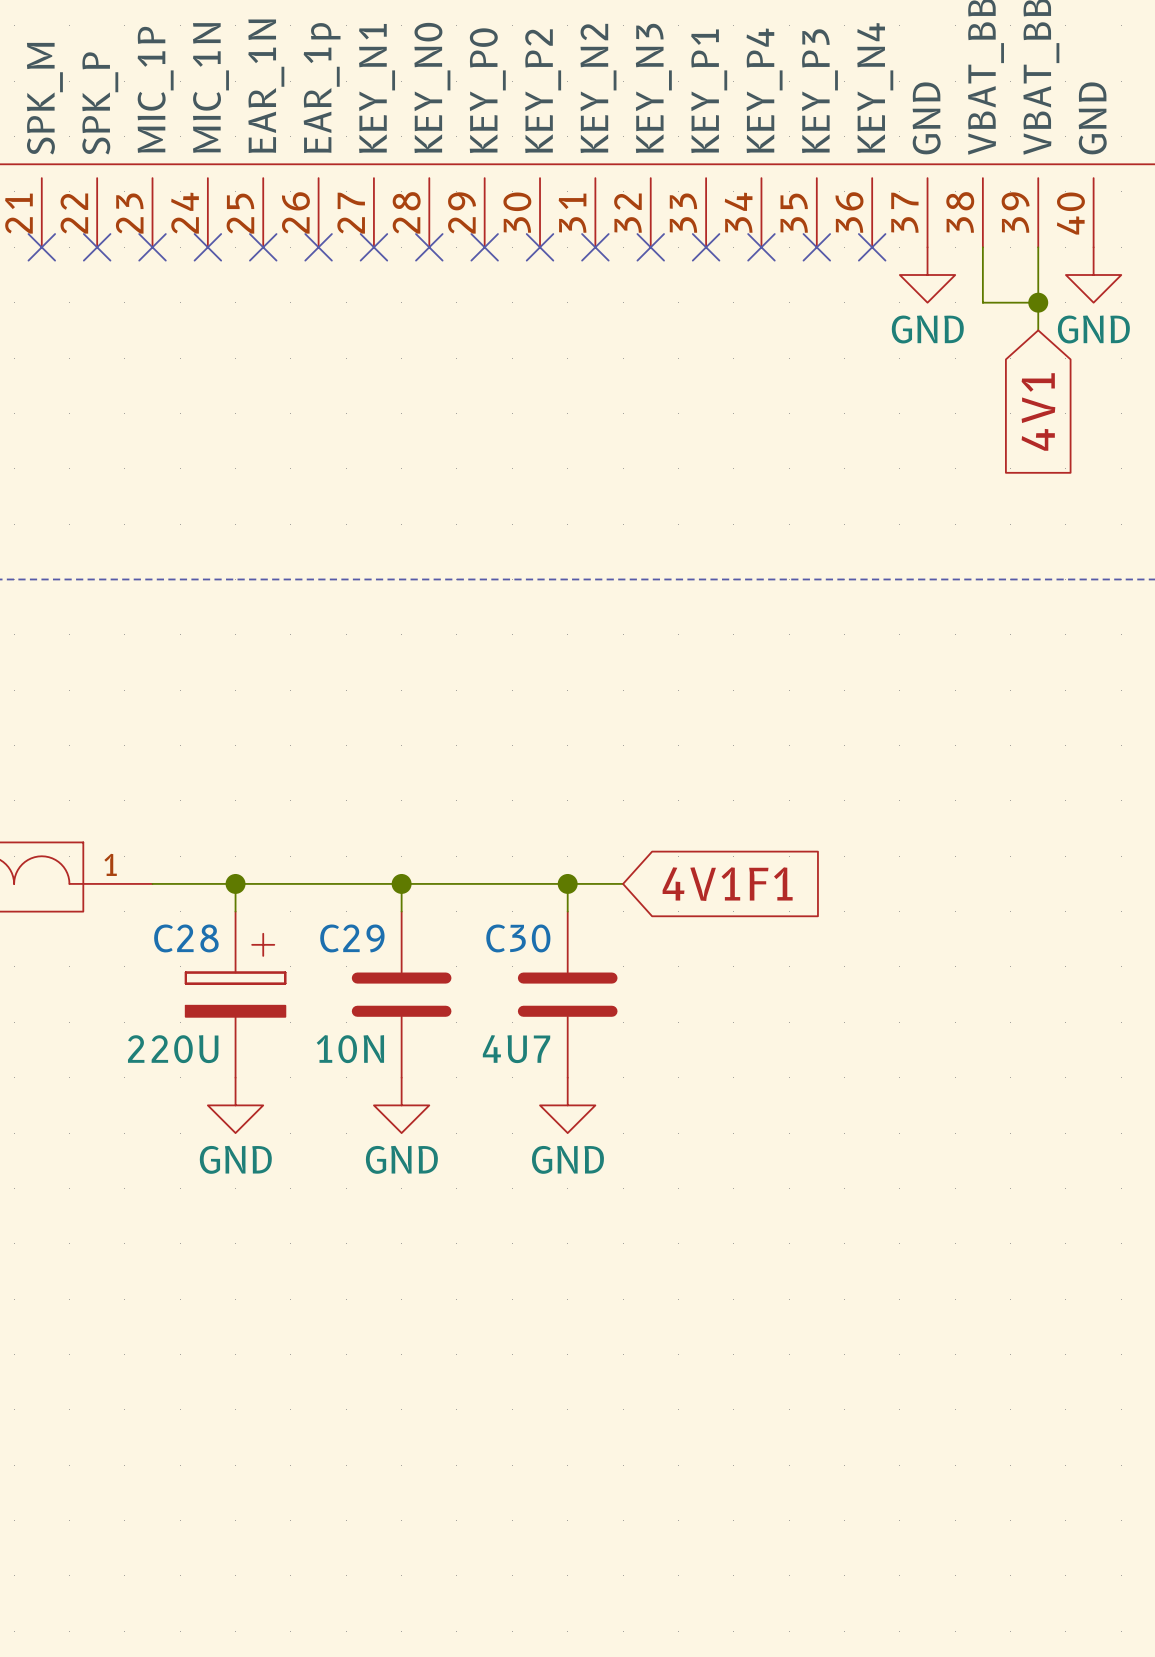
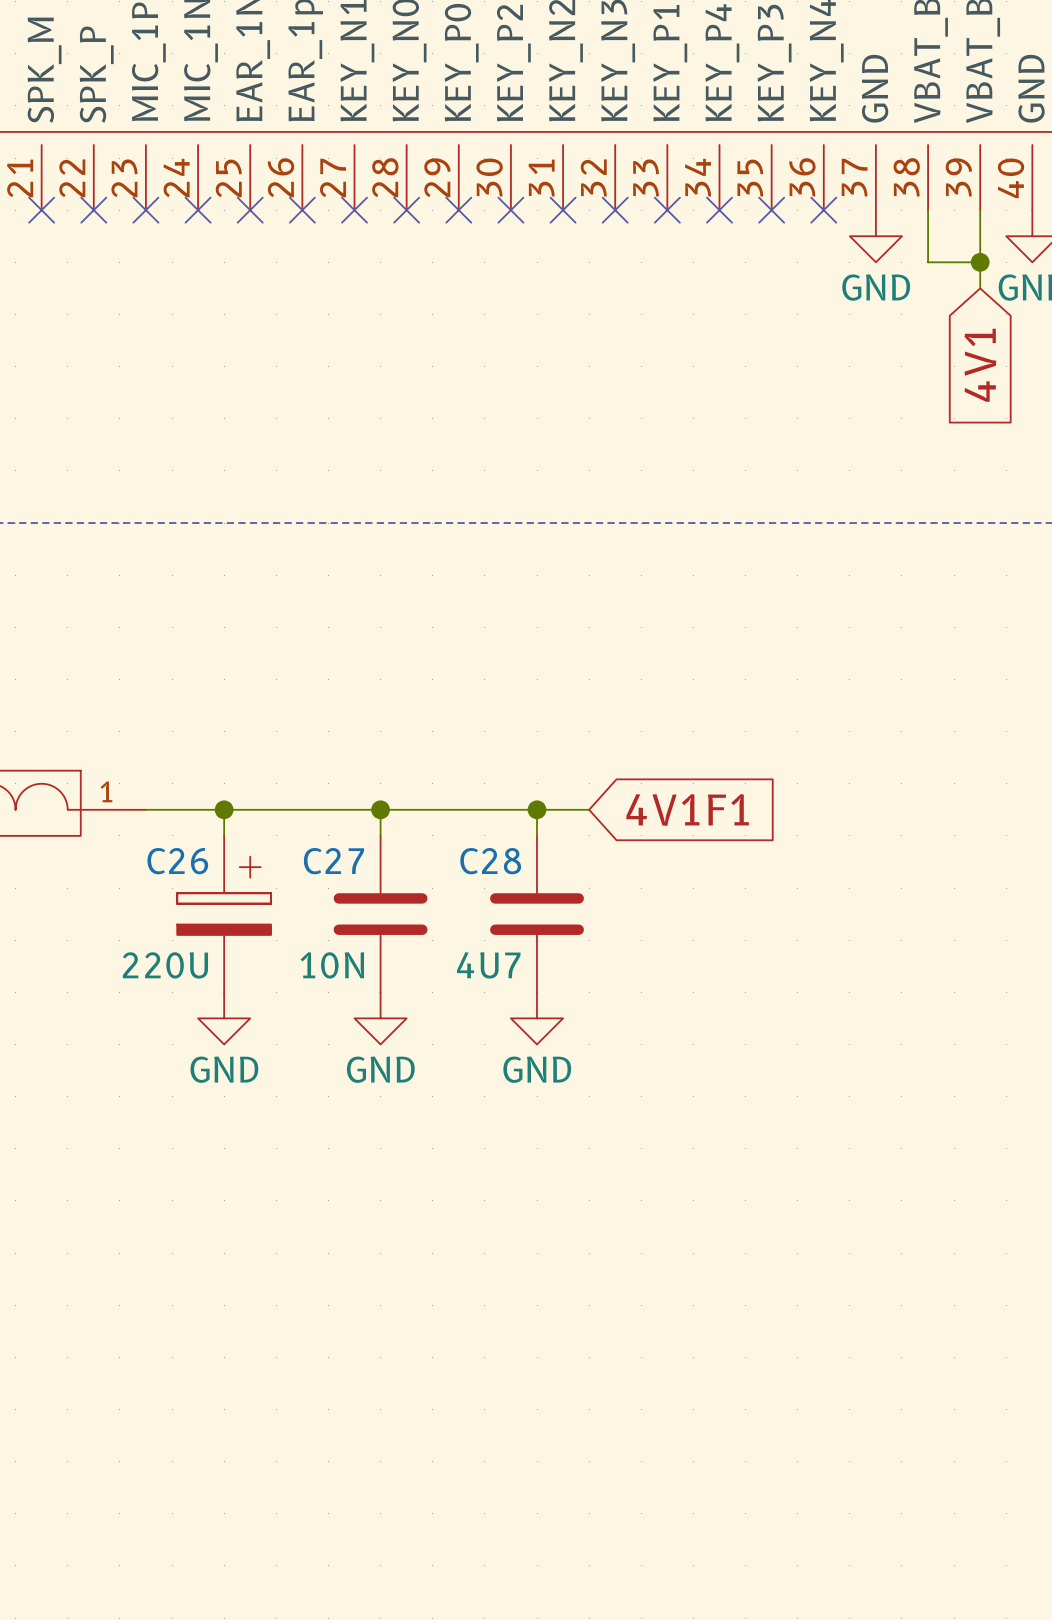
C28 name: C28 (186, 938) -> C26 (177, 861)
C29 name: C29 (352, 938) -> C27 (333, 861)
C30 name: C30 (518, 938) -> C28 (490, 861)

